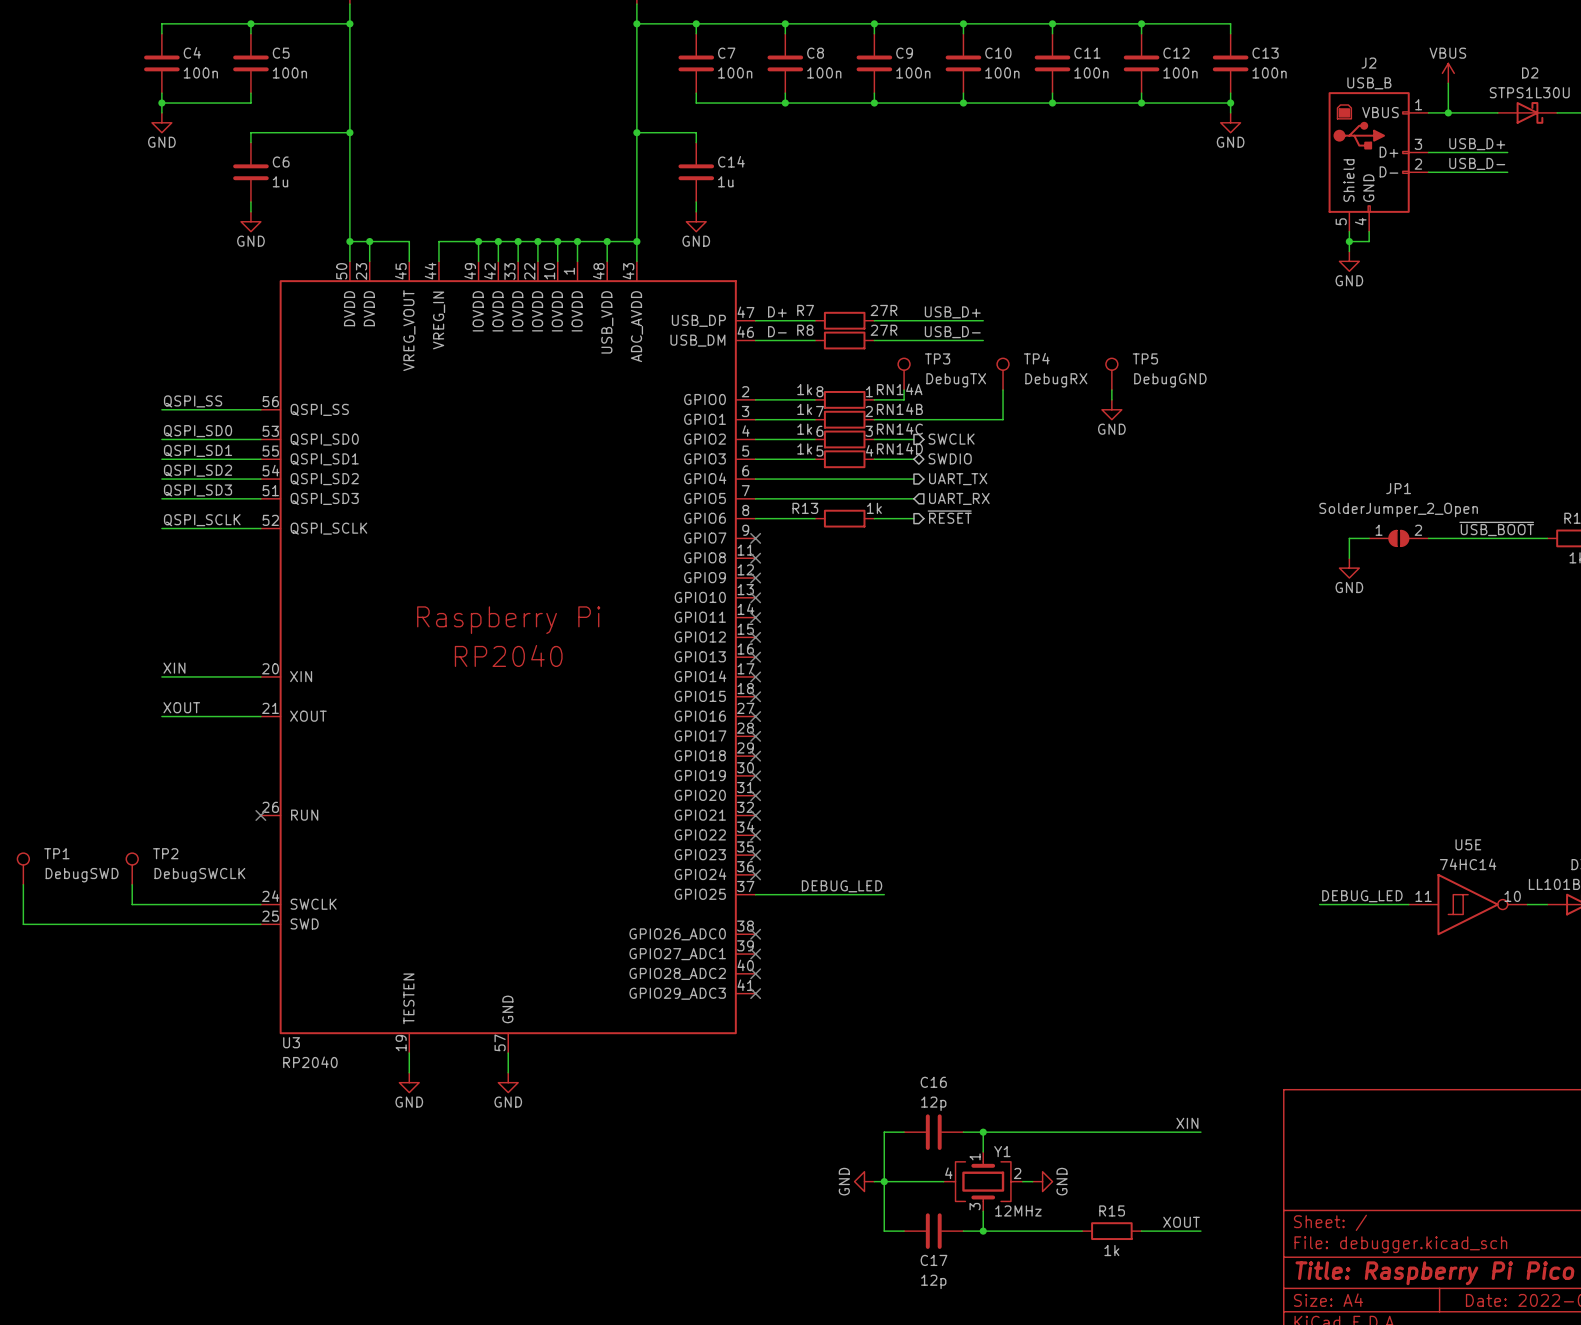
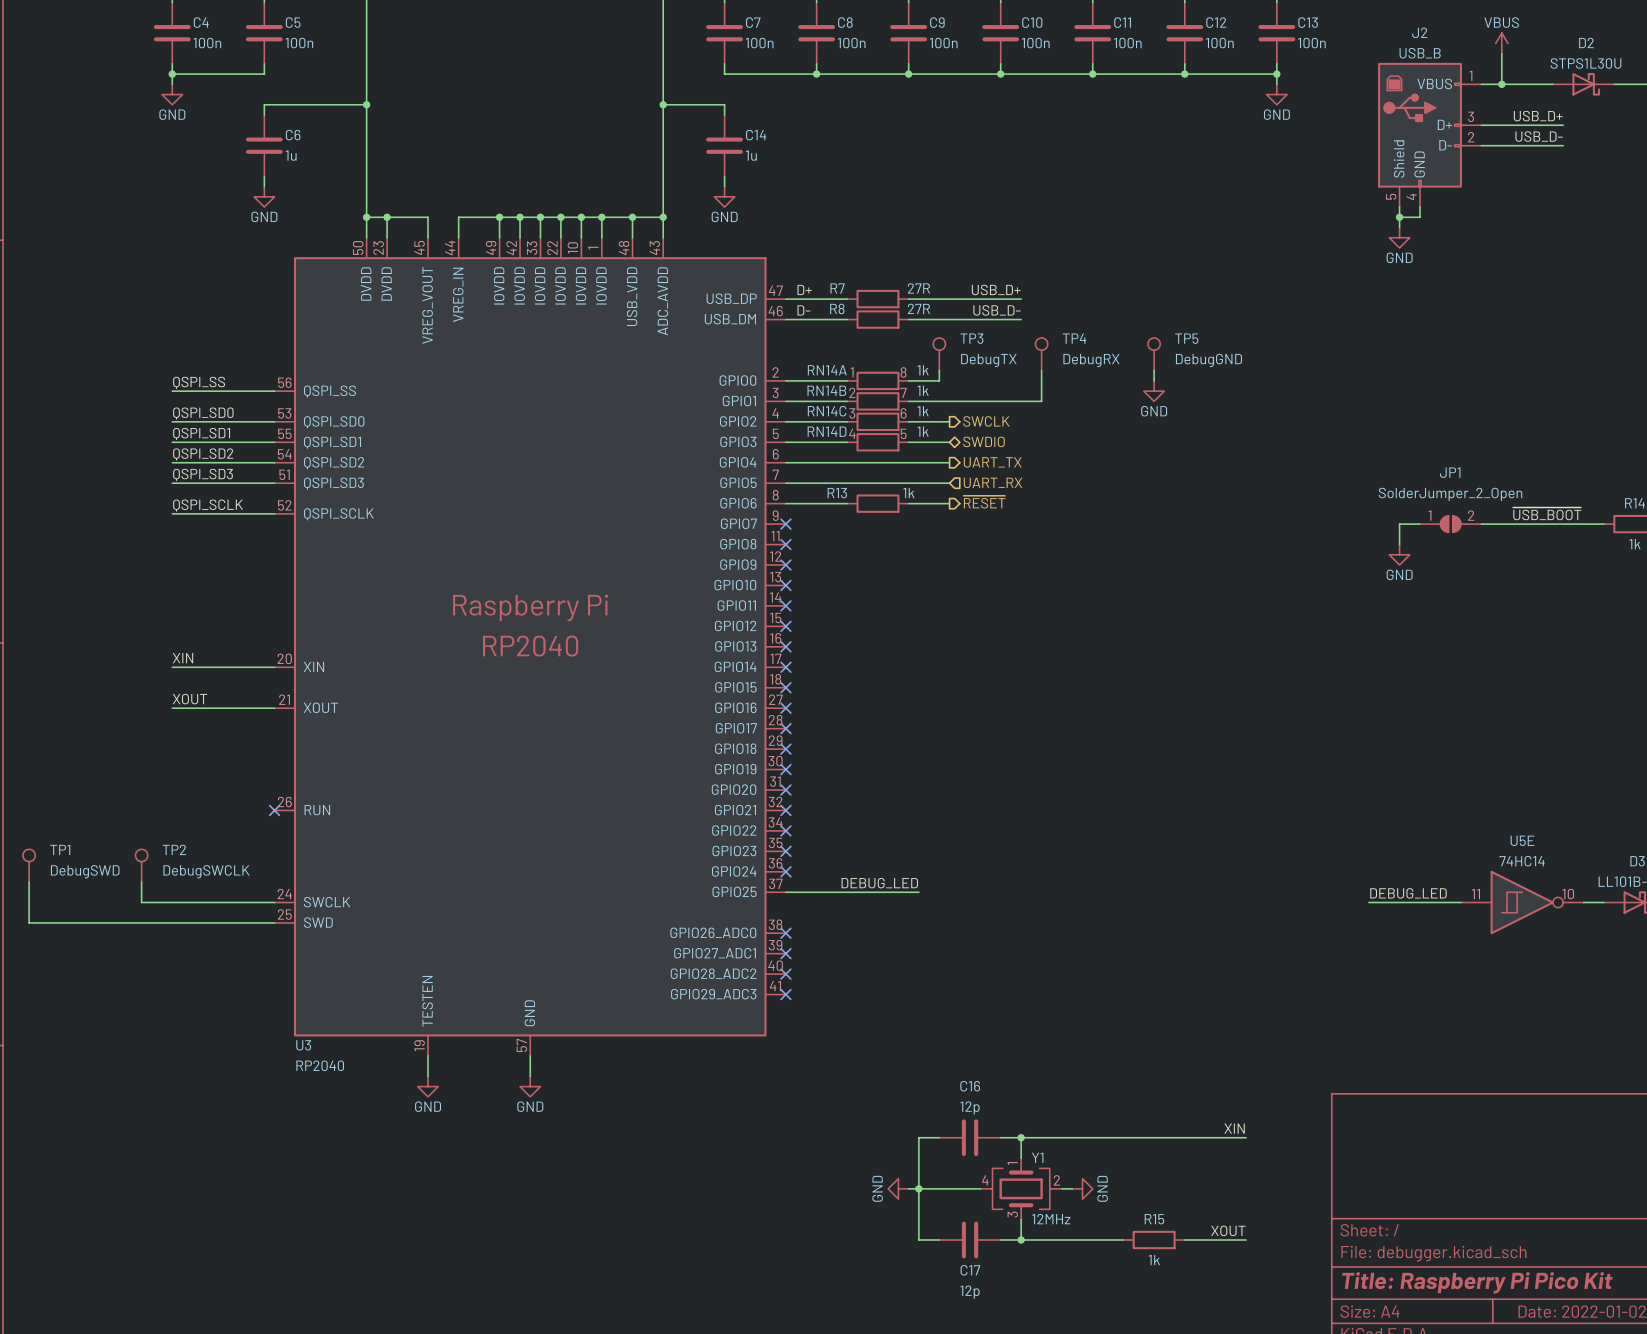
RN14A value position: 1k (804, 389) -> 1k (923, 370)
RN14A name position: RN14A (899, 389) -> RN14A (827, 370)
RN14A rotation: 0° (844, 399) -> 180° (877, 380)
RN14B value position: 1k (804, 409) -> 1k (923, 390)
RN14B name position: RN14B (899, 409) -> RN14B (826, 390)
RN14B rotation: 0° (844, 419) -> 180° (877, 401)
RN14C name position: RN14C (899, 428) -> RN14C (827, 411)
RN14C value position: 1k (804, 429) -> 1k (923, 411)
RN14C rotation: 0° (844, 439) -> 180° (877, 421)
RN14D value position: 1k (804, 448) -> 1k (923, 431)
RN14D name position: RN14D (899, 448) -> RN14D (827, 431)
RN14D rotation: 0° (844, 459) -> 180° (877, 442)

